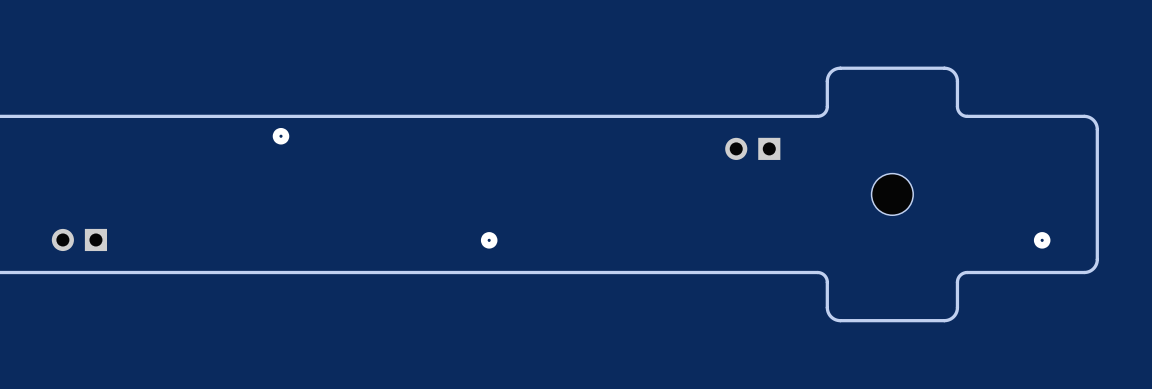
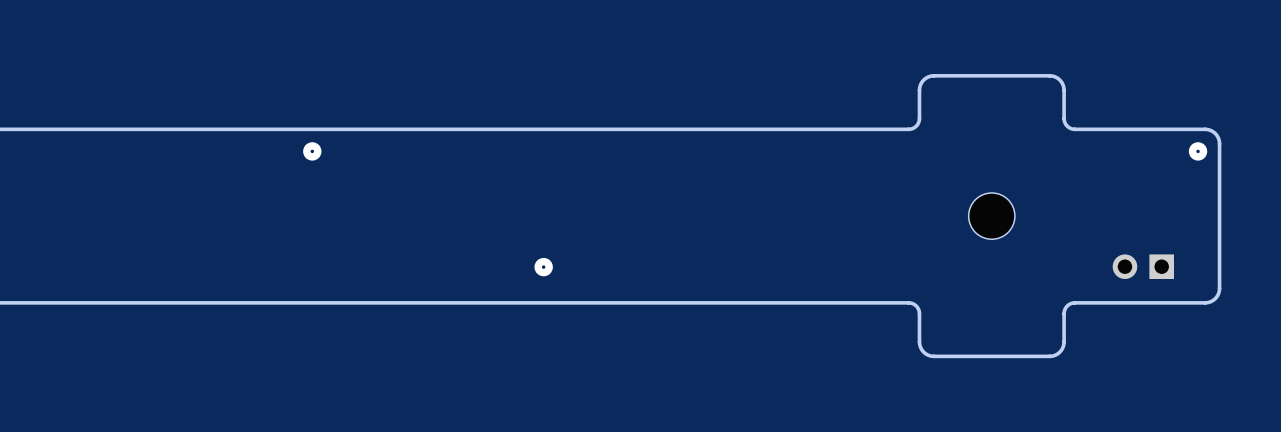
part position: (752, 148) -> (1143, 266)
part: (79, 239) -> none
part position: (1042, 240) -> (1198, 151)

